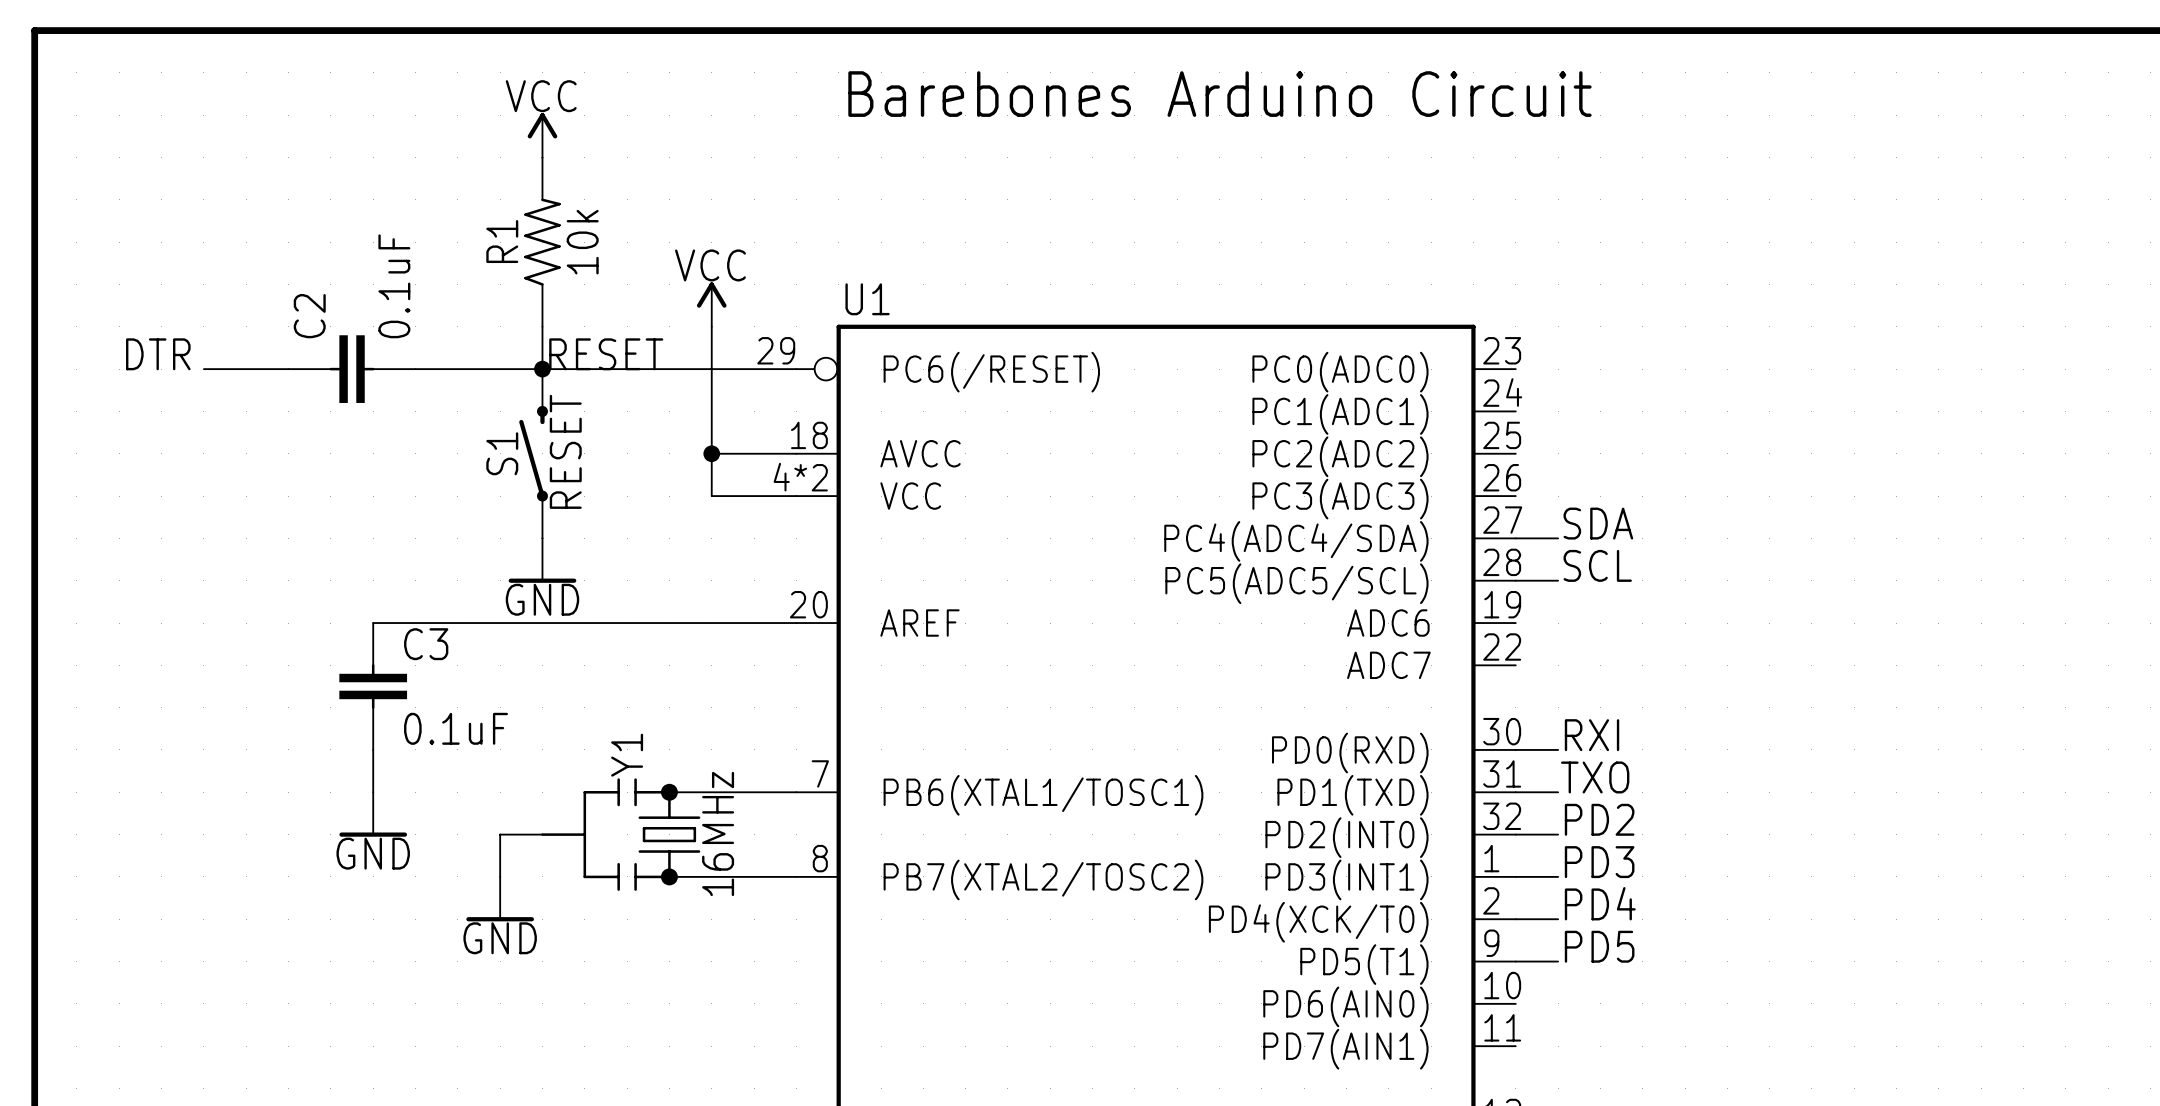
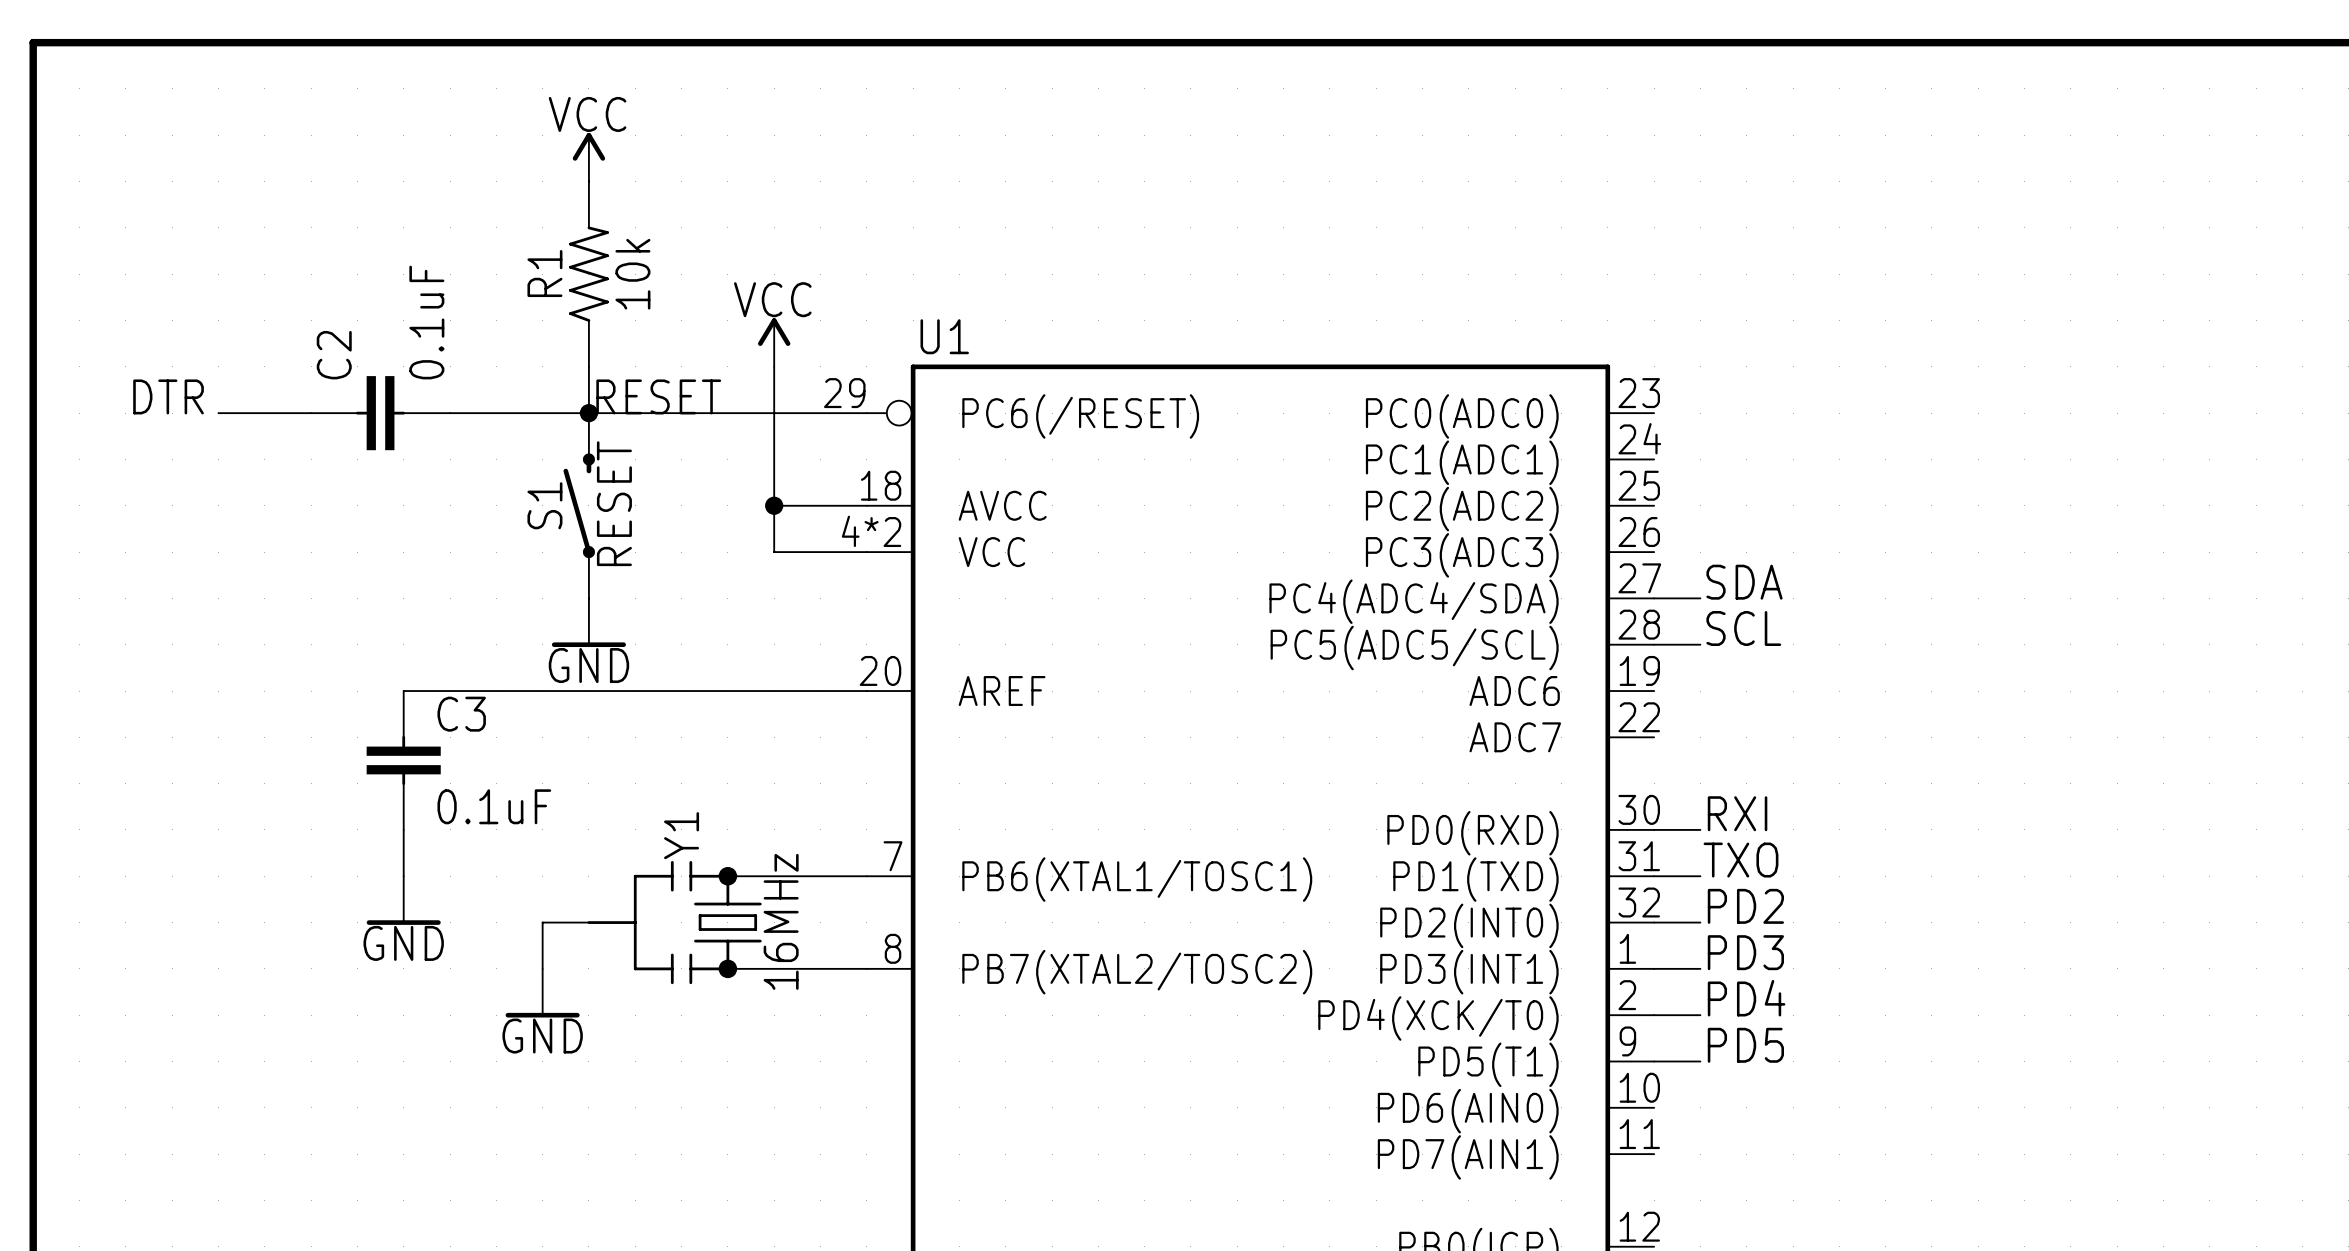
text: Barebones Arduino Circuit (1219, 94) -> none

